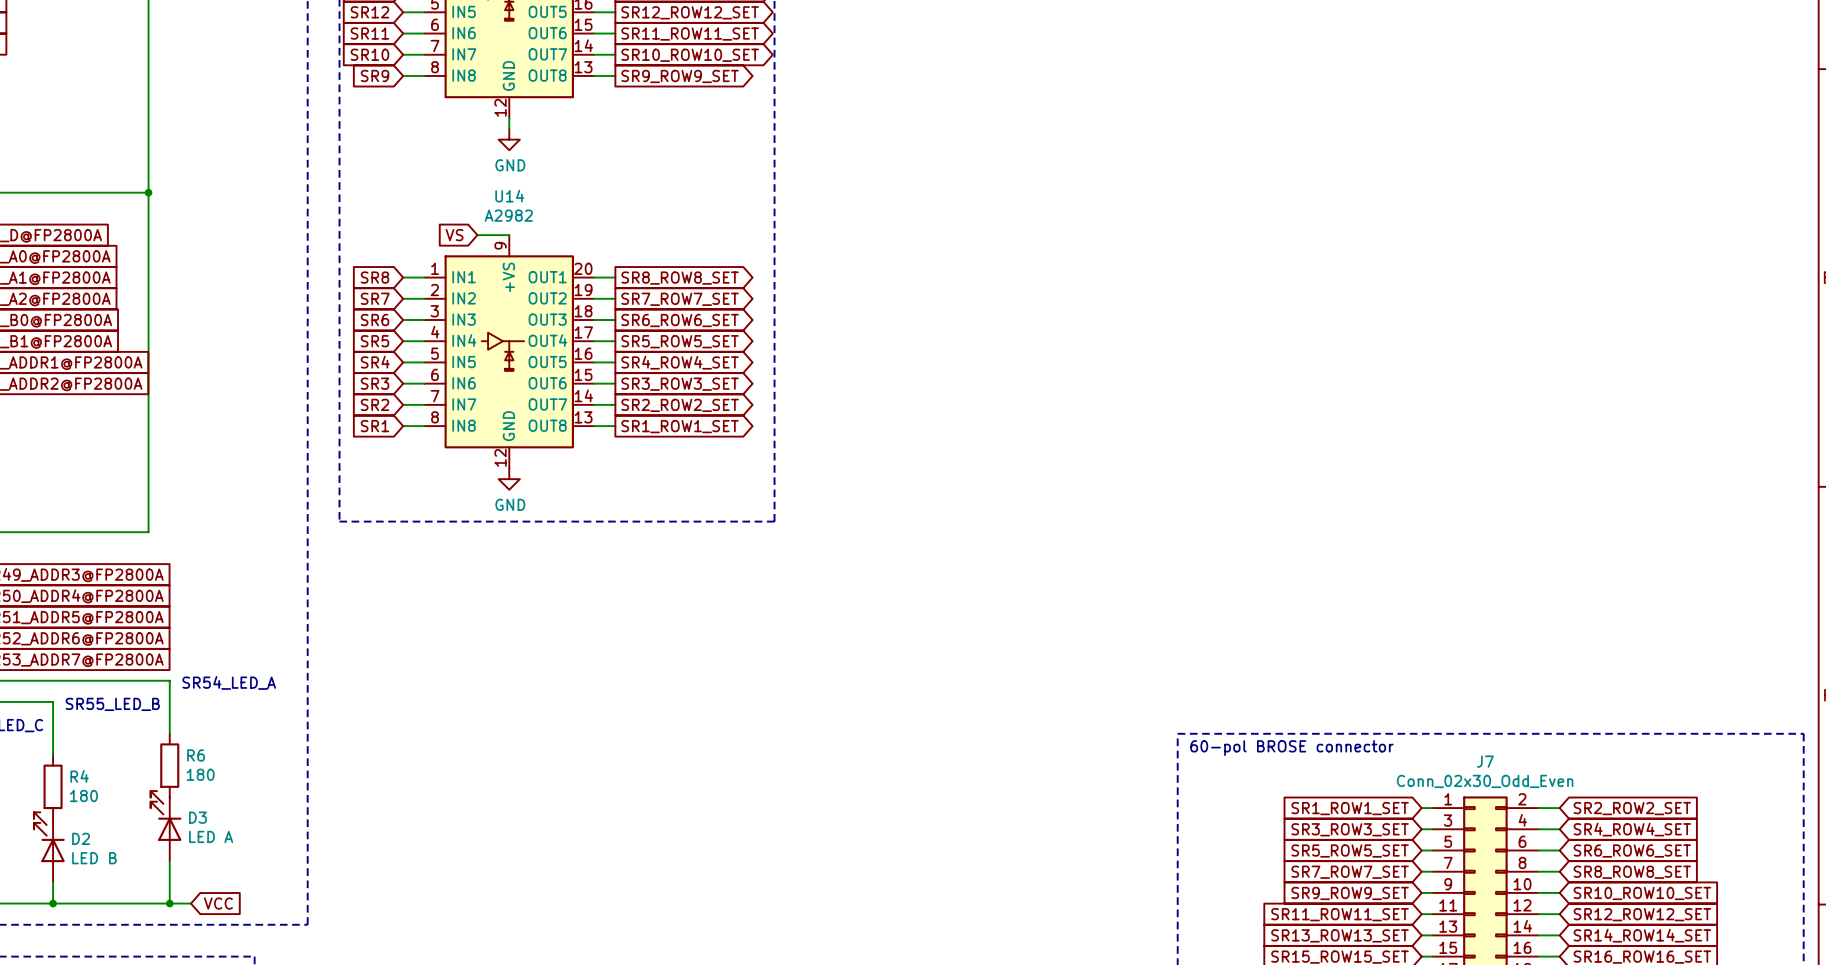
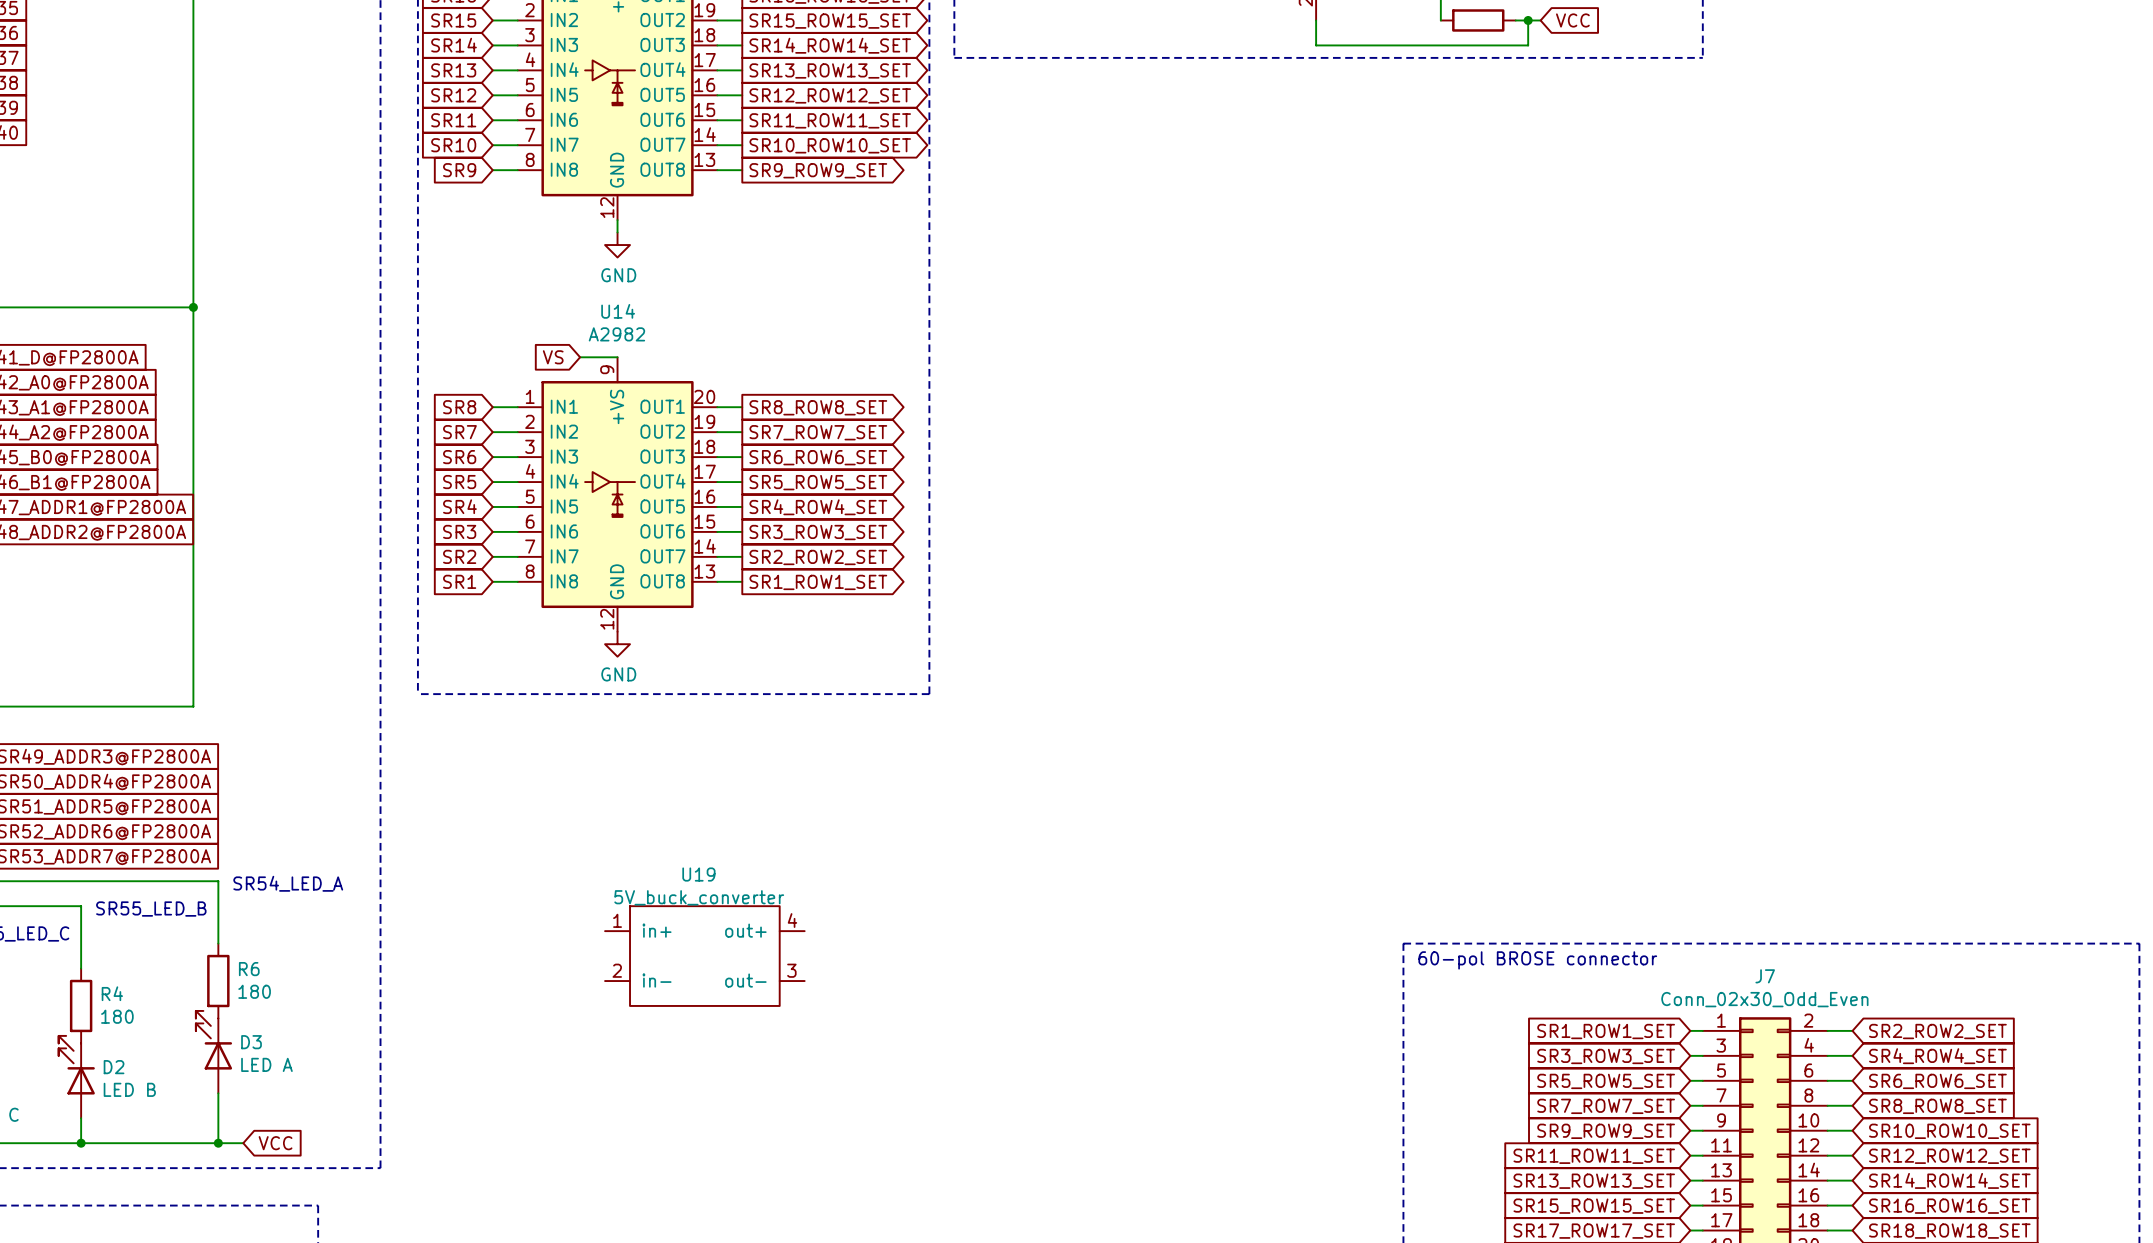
U19: none -> 5V_buck_converter (704, 956)

